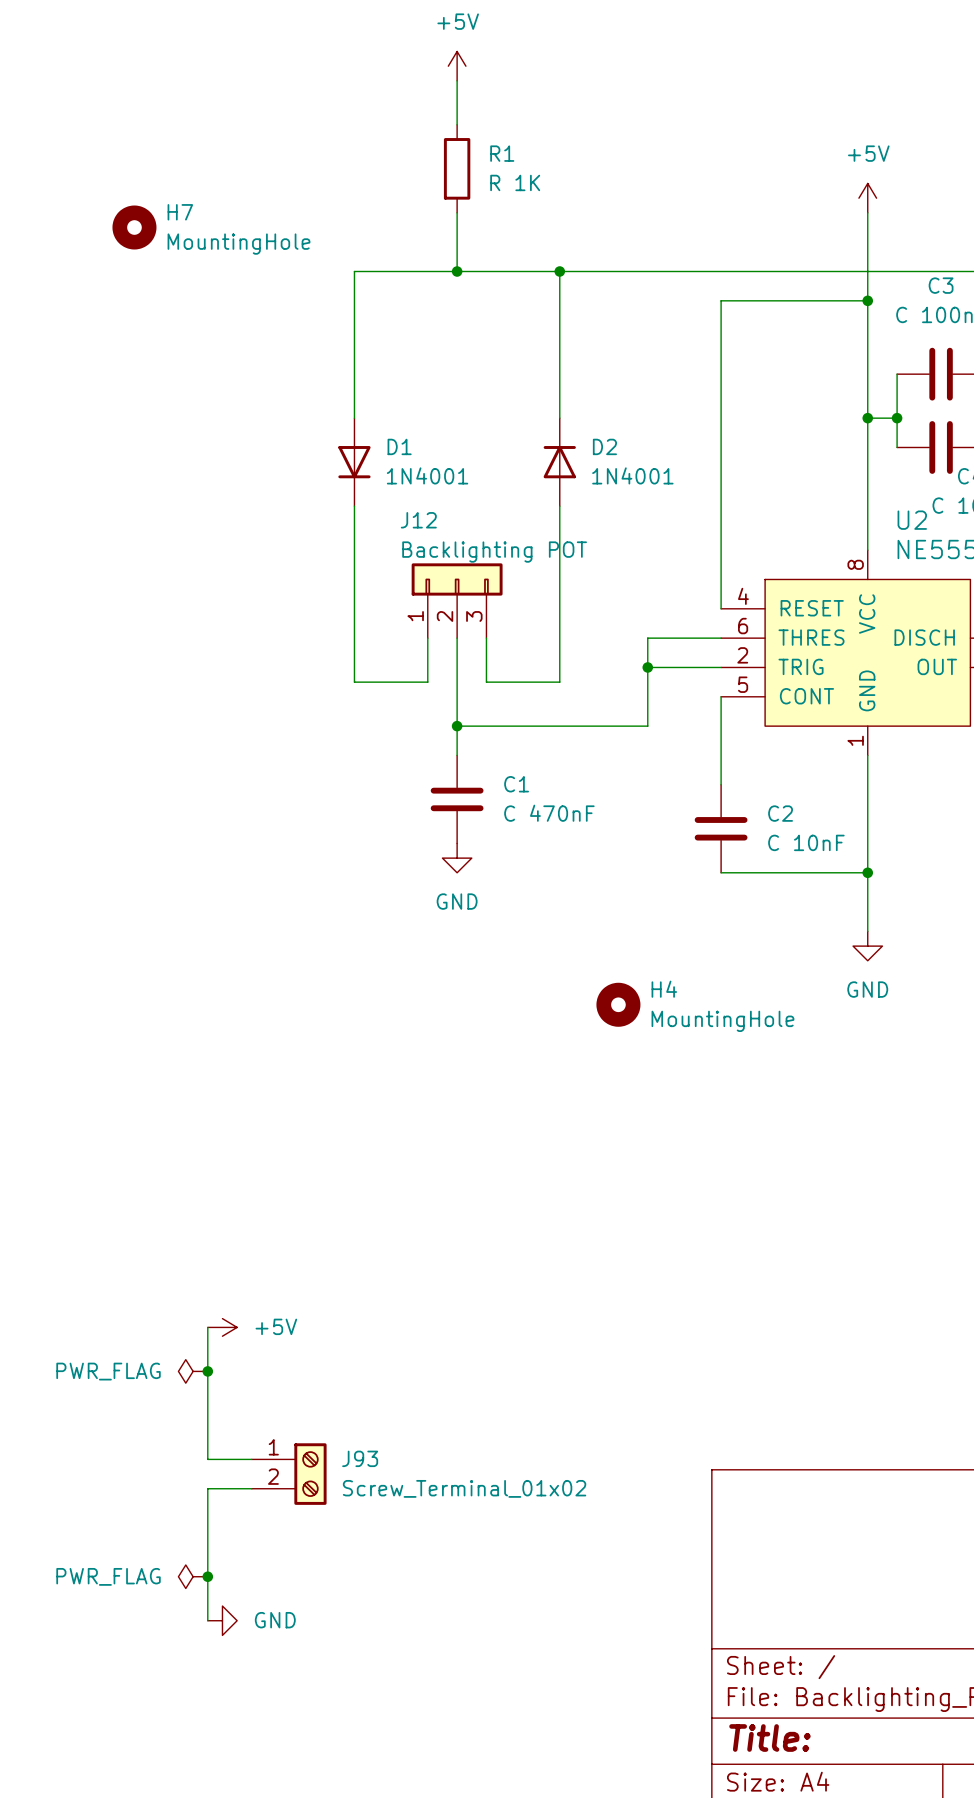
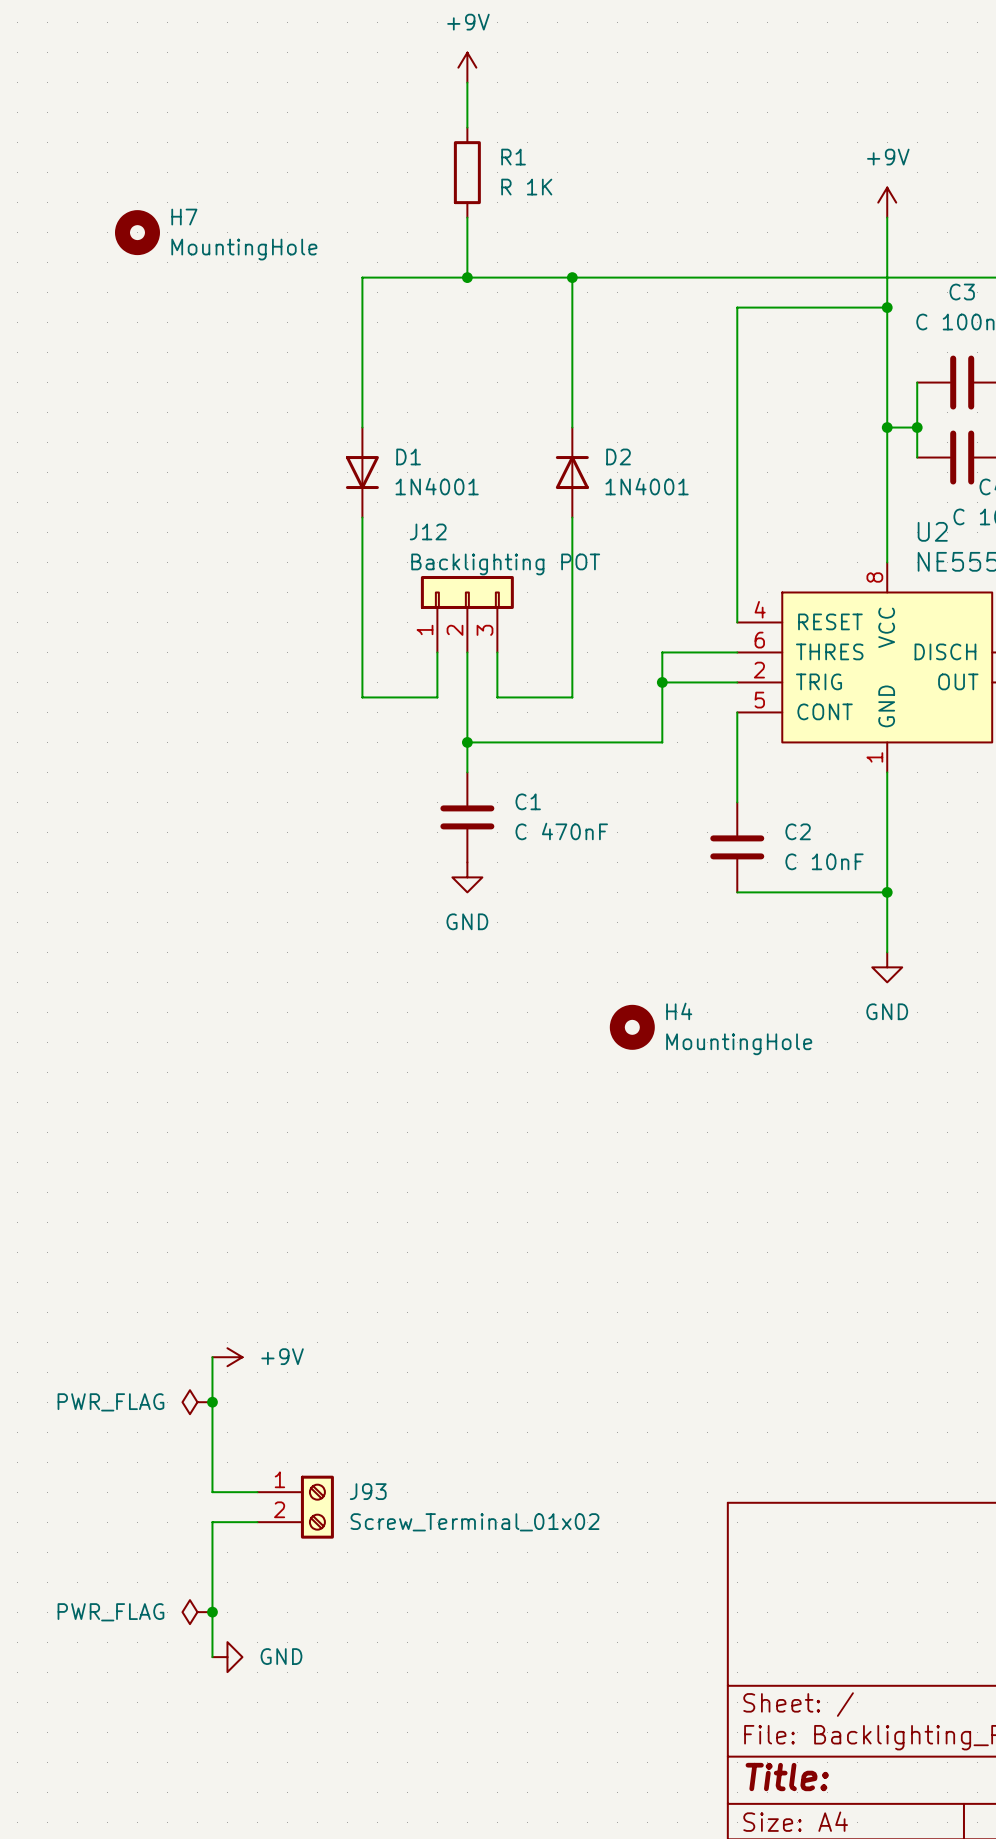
power symbol: +5V (457, 66) -> +9V (467, 67)
power symbol: +5V (867, 198) -> +9V (887, 202)
power symbol: +5V (222, 1327) -> +9V (227, 1357)

